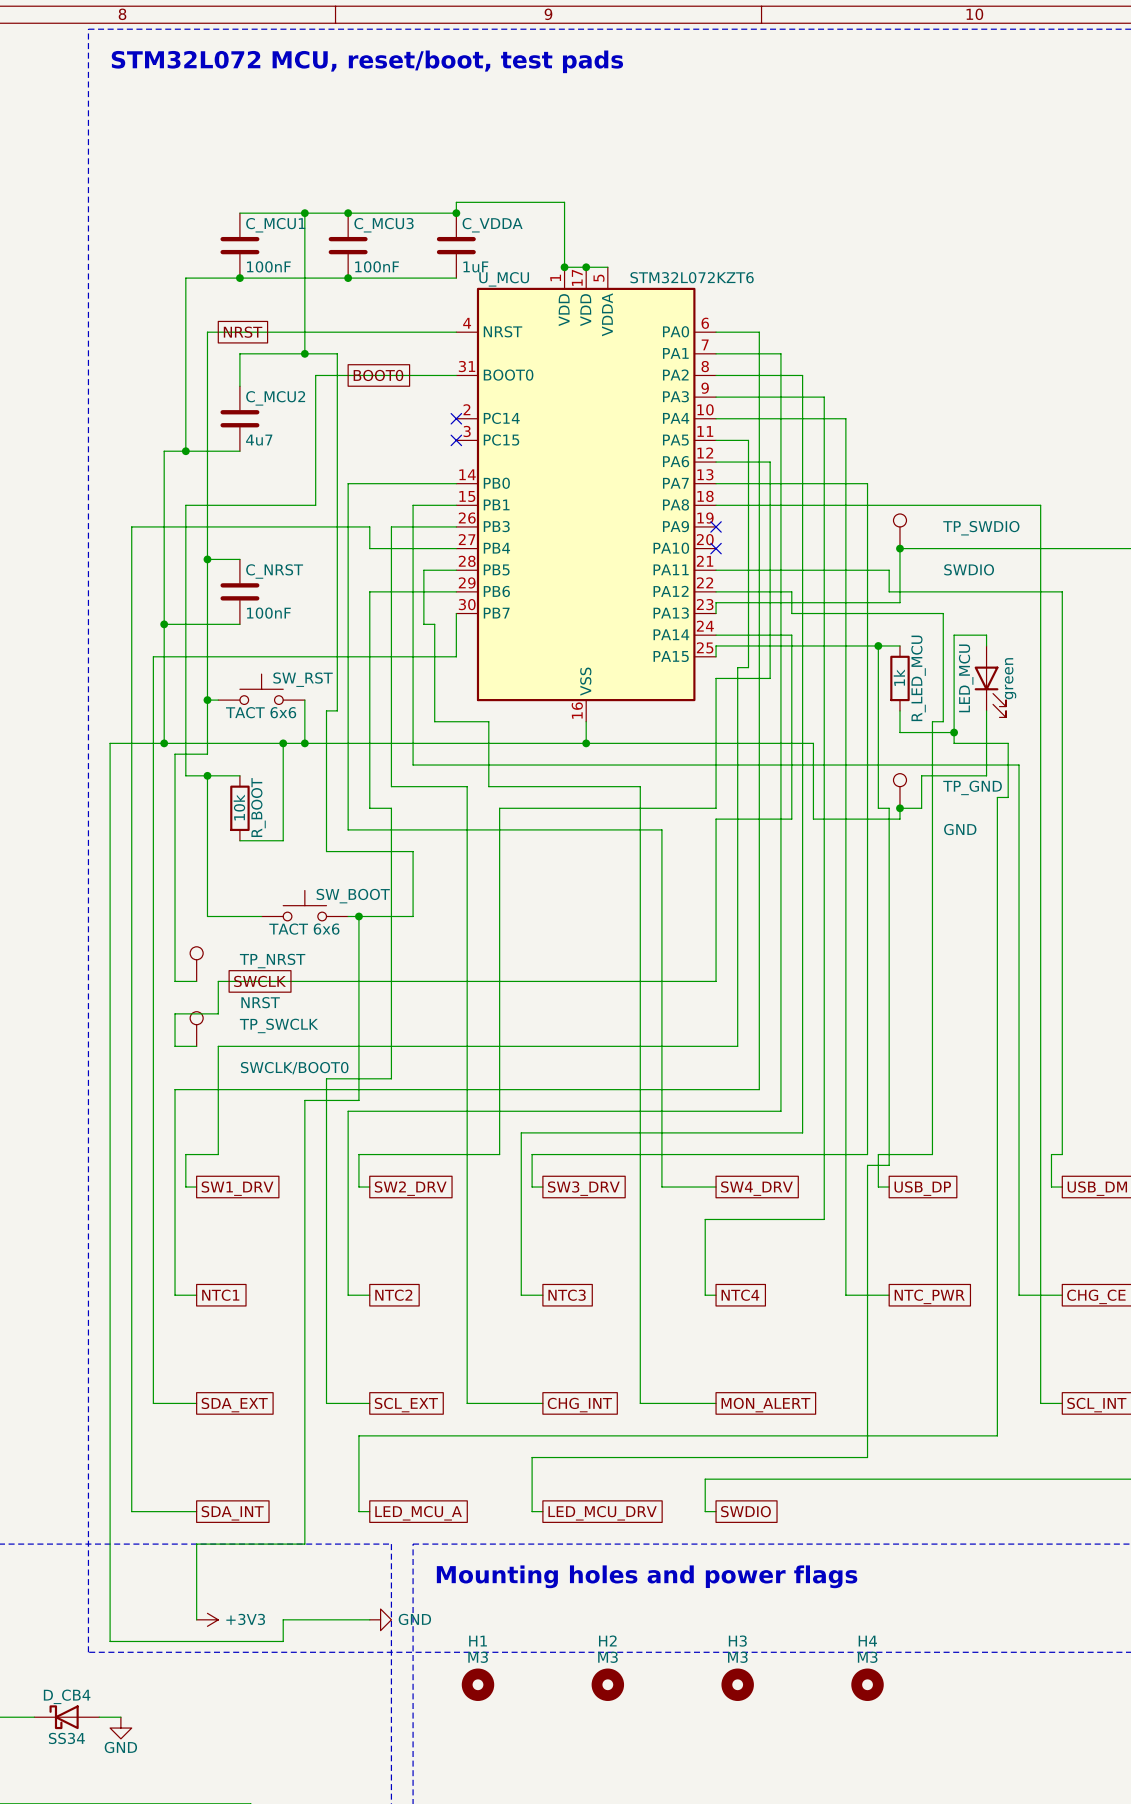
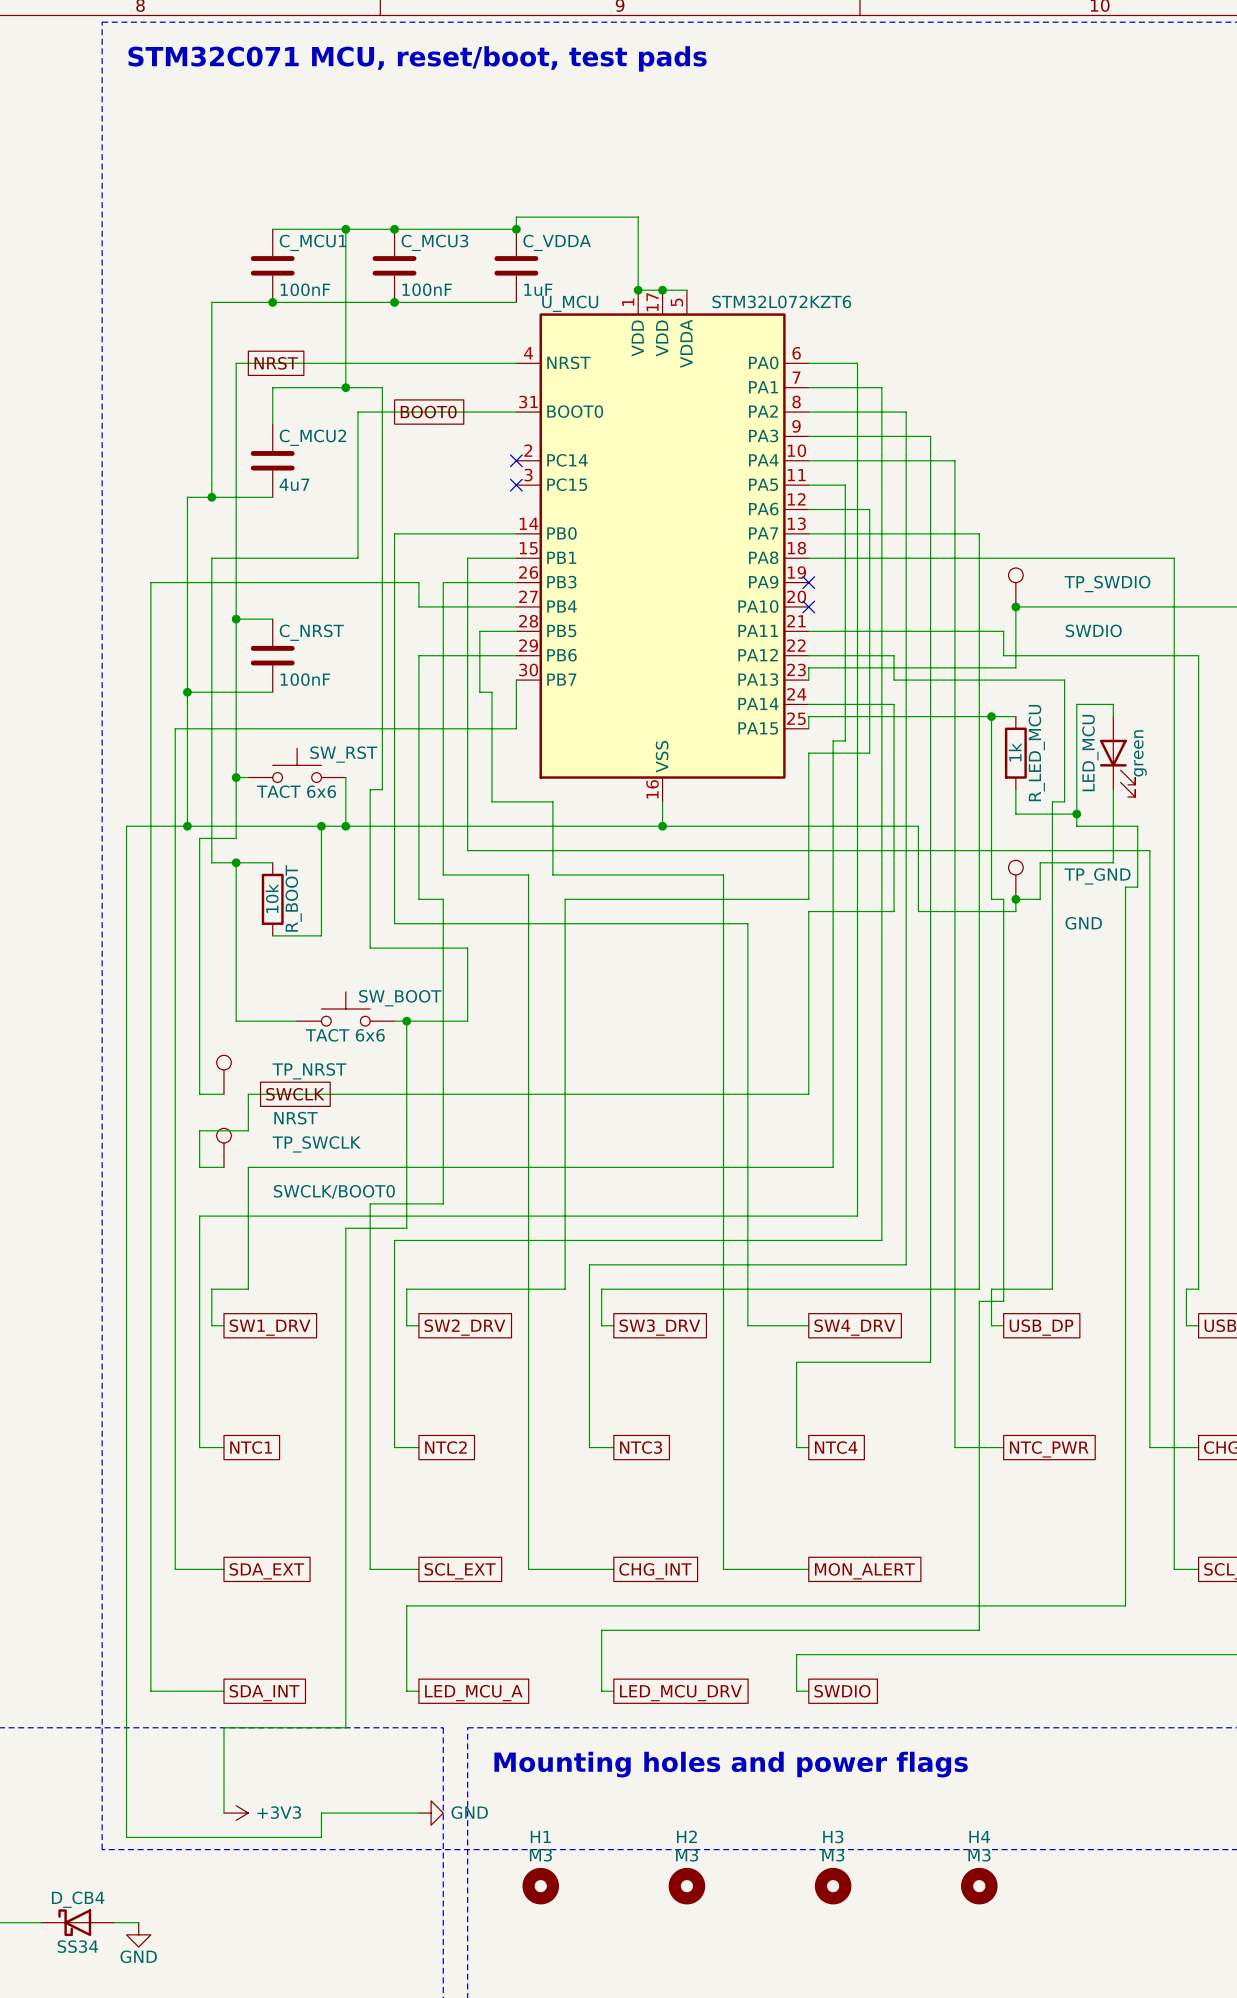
text: STM32L072 MCU, reset/boot, test pads (367, 61) -> STM32C071 MCU, reset/boot, test pads (417, 58)

